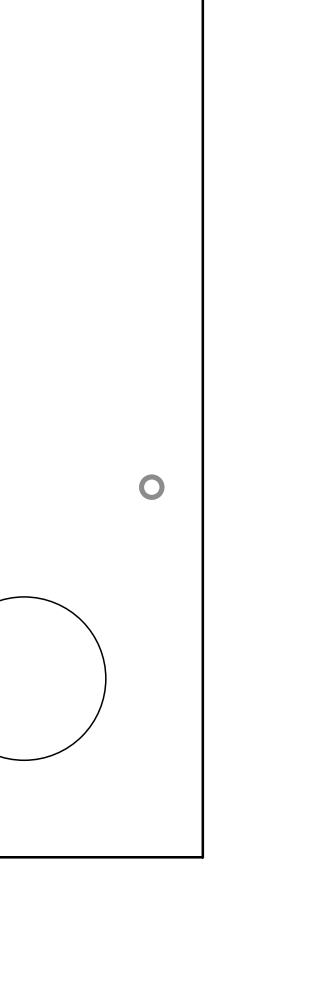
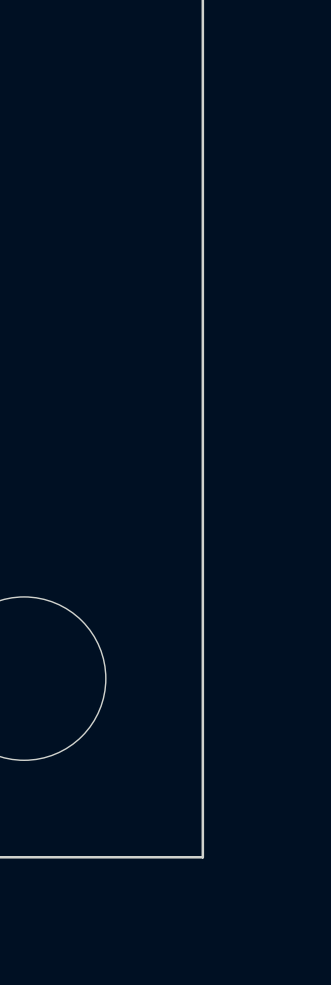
via: (151, 487) -> none

